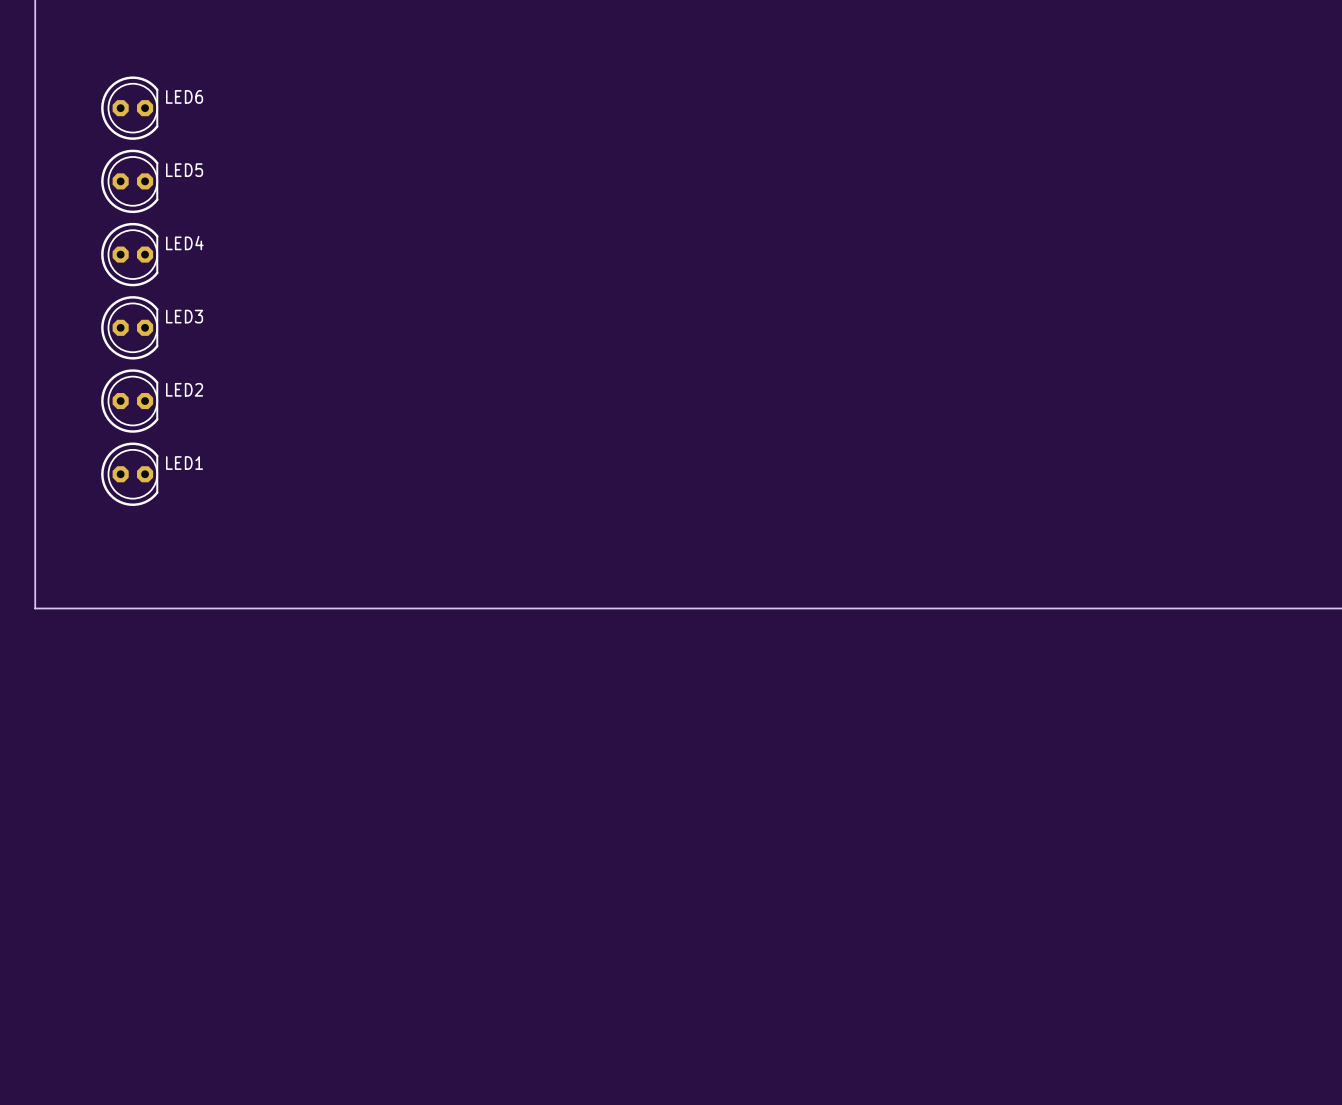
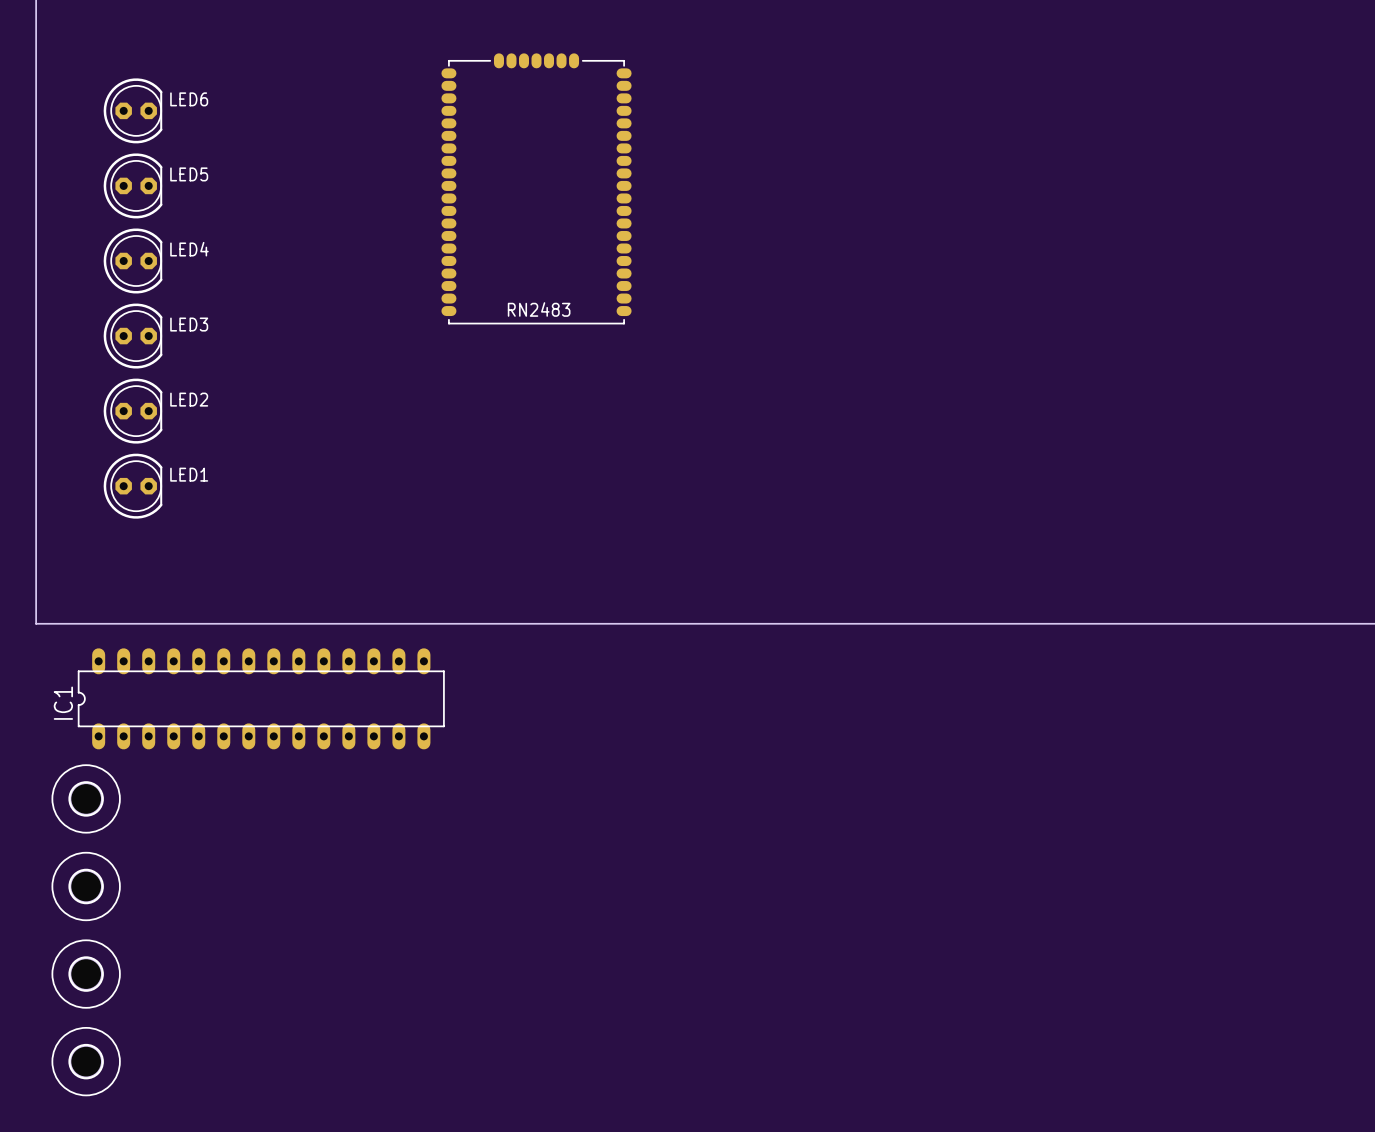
part: none -> (536, 188)
IC1: none -> (261, 698)
part: none -> (86, 798)
part: none -> (86, 886)
part: none -> (86, 974)
part: none -> (86, 1061)

